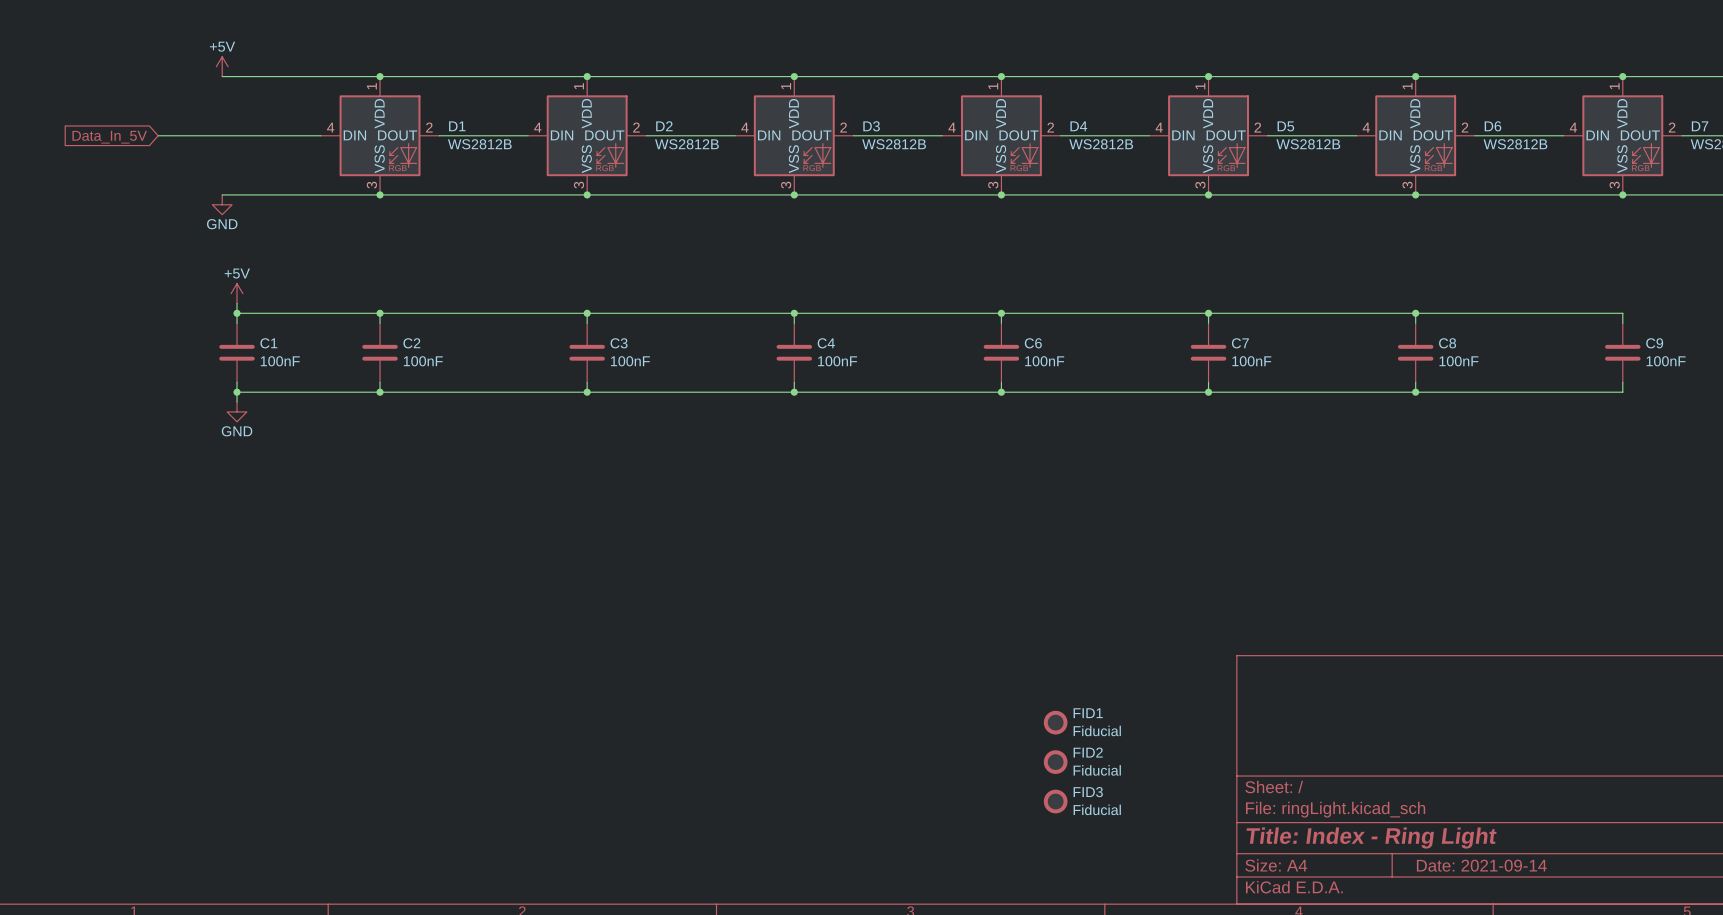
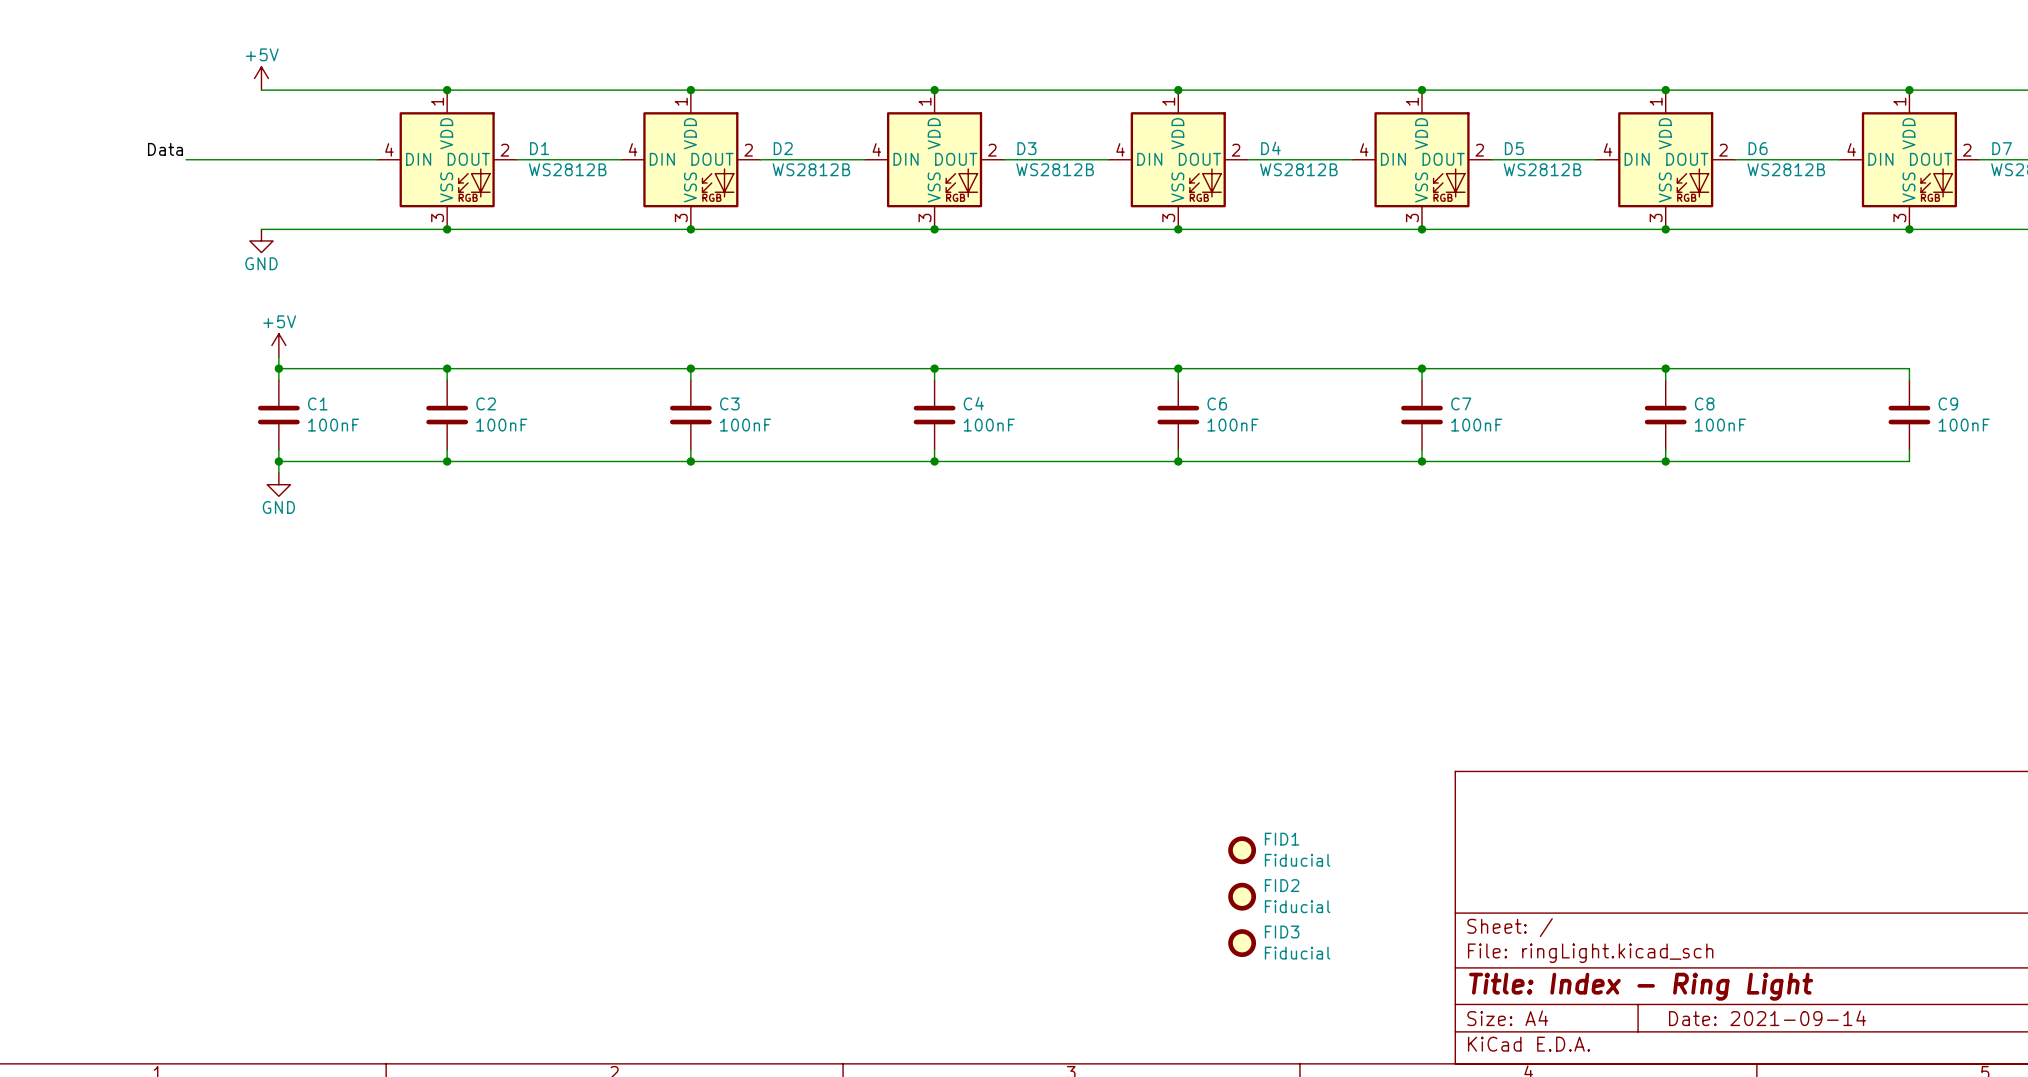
label: none -> Data (165, 149)
global label: Data_In_5V (109, 137) -> none

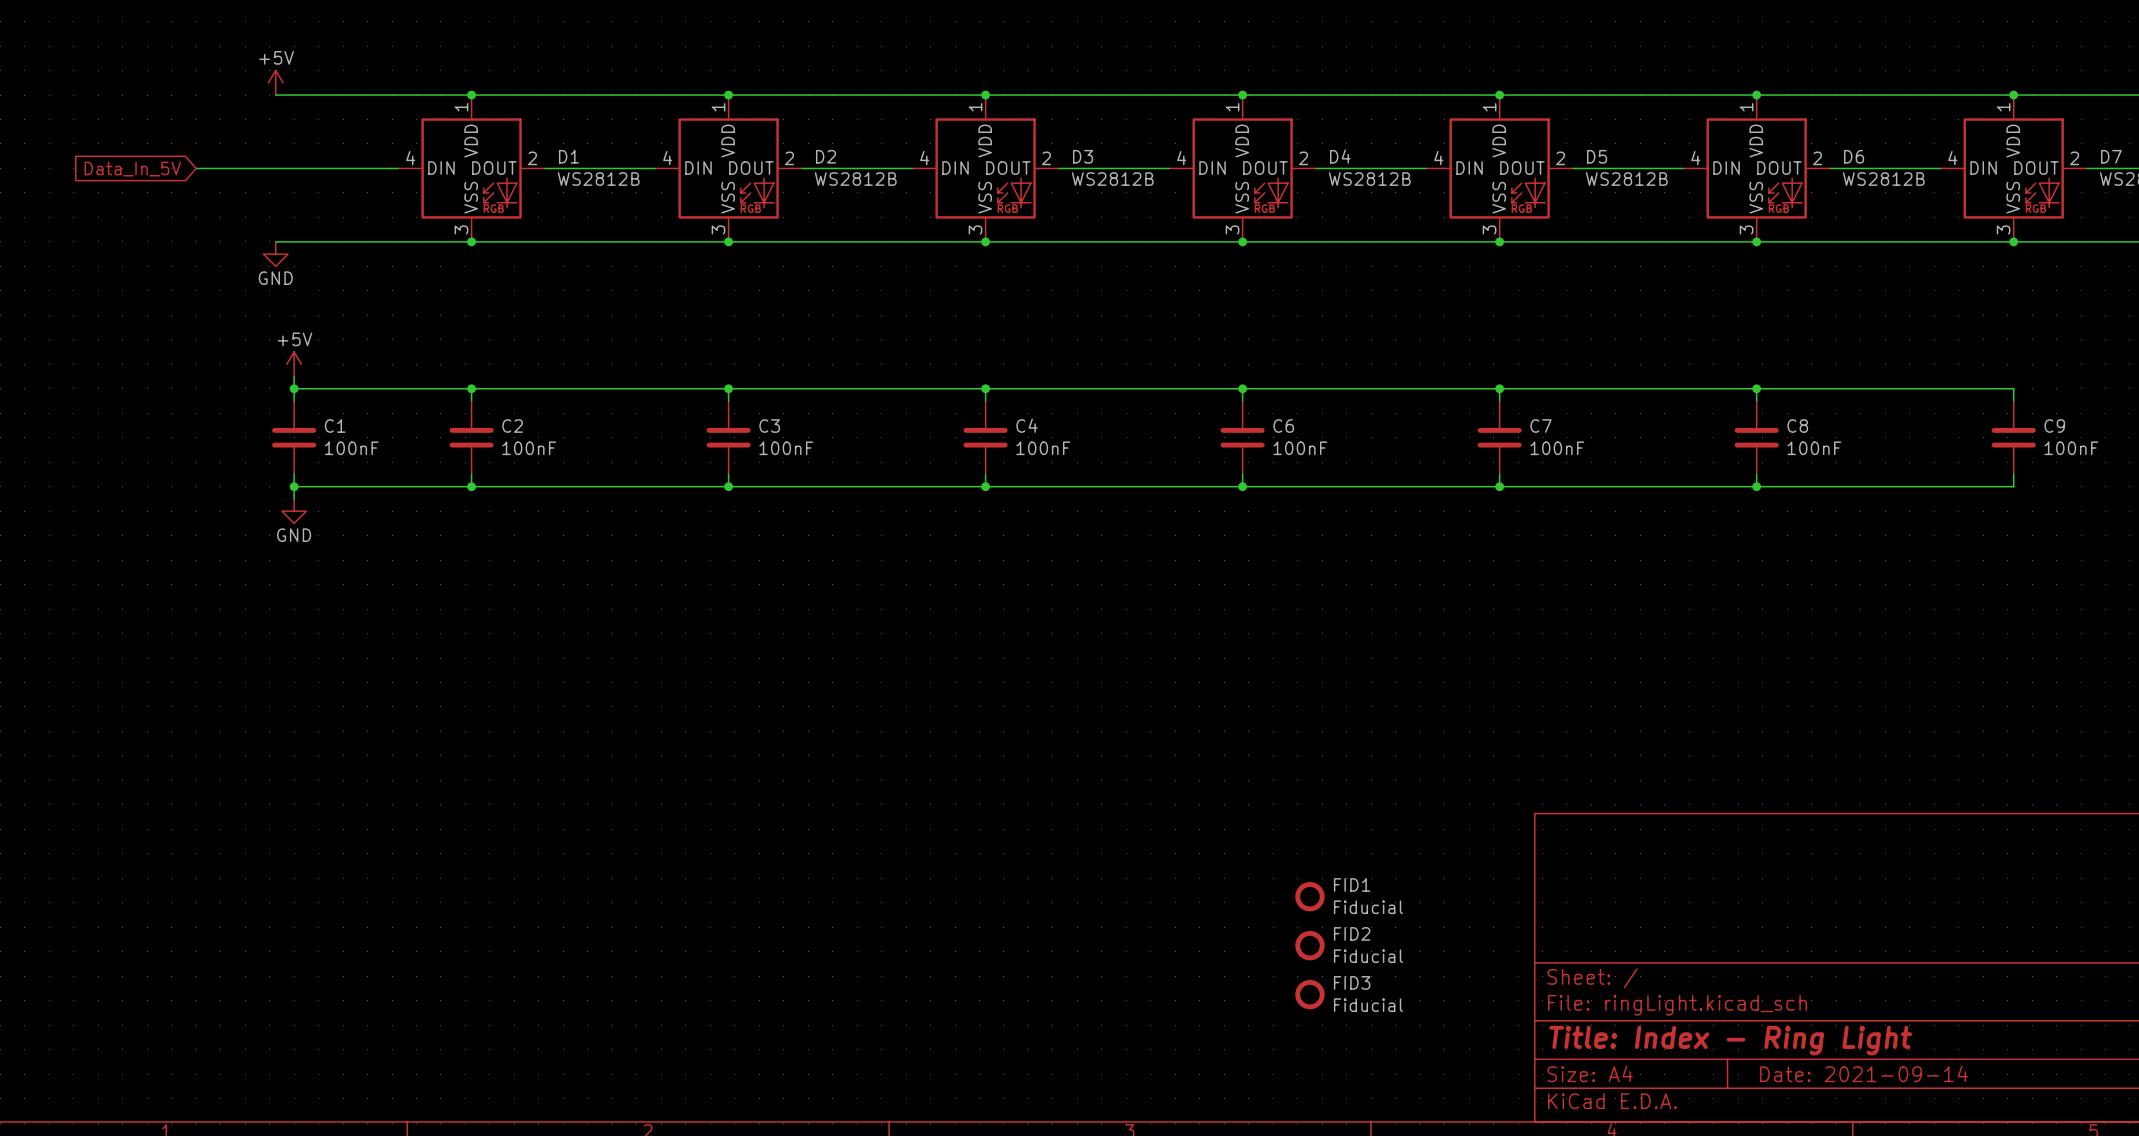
label: Data (165, 149) -> none
global label: none -> Data_In_5V (132, 169)

